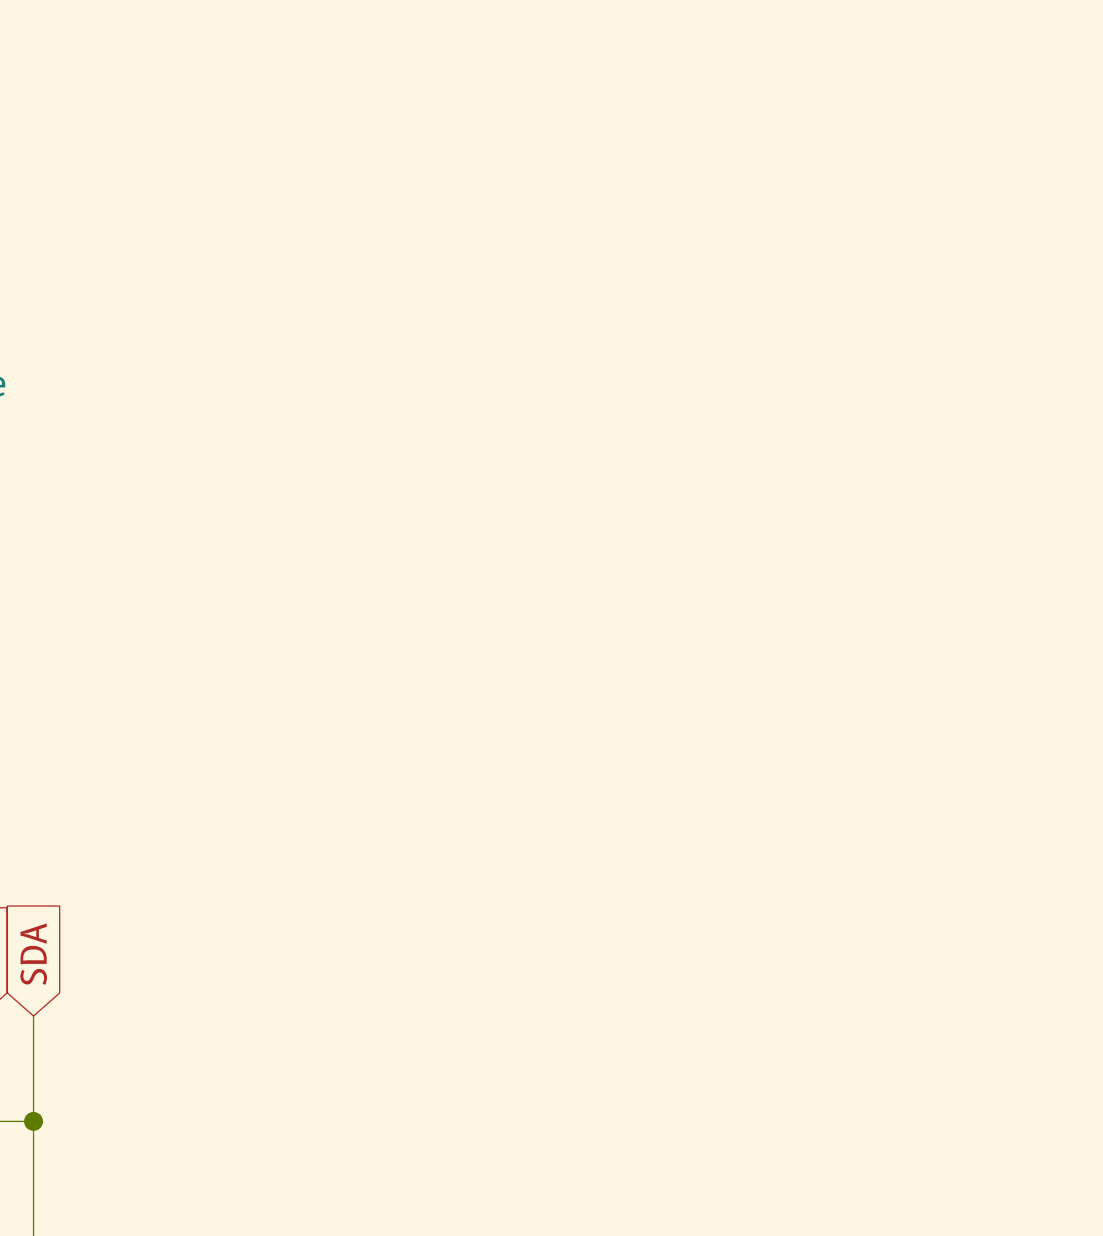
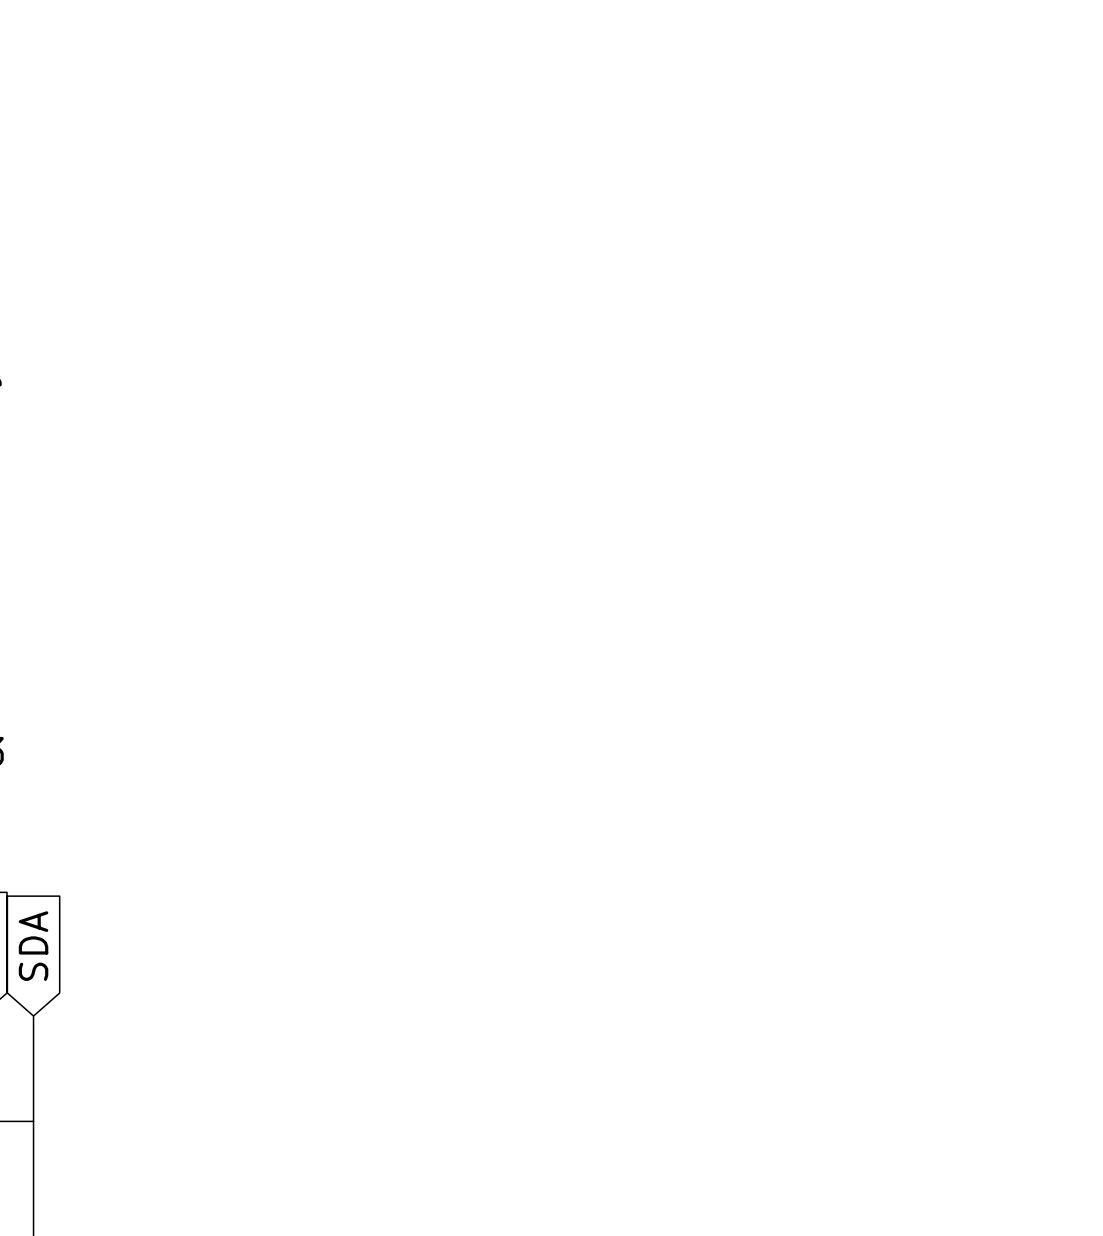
junction: (33, 1121) -> none

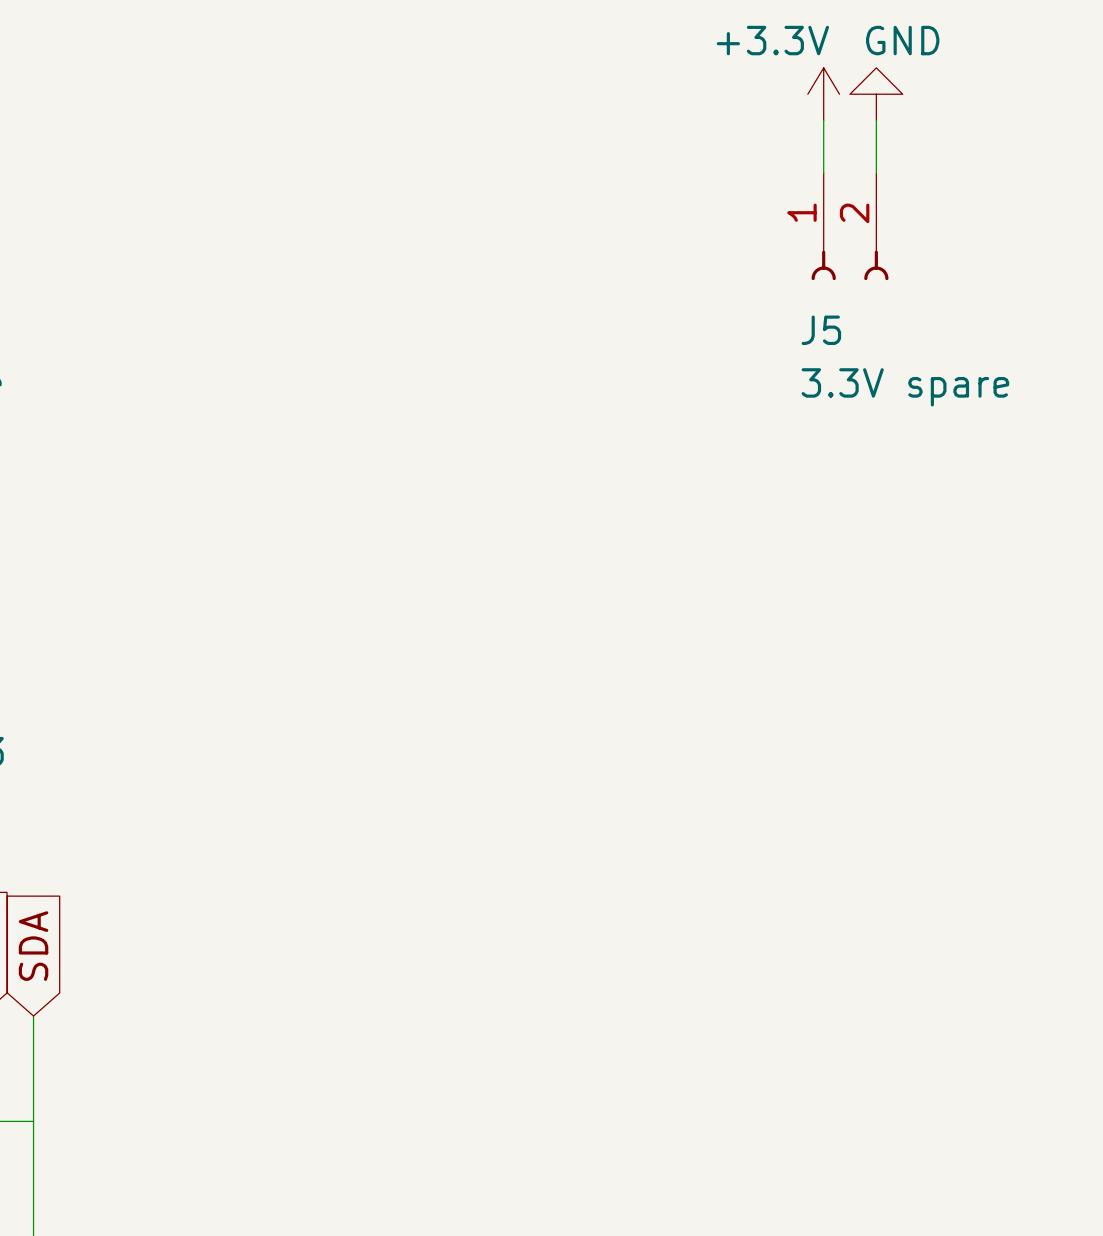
power symbol: none -> +3.3V (823, 94)
power symbol: none -> GND (876, 94)
wire: none -> (823, 120) (823, 173)
wire: none -> (876, 120) (876, 173)
J5: none -> 3.3V spare (850, 226)

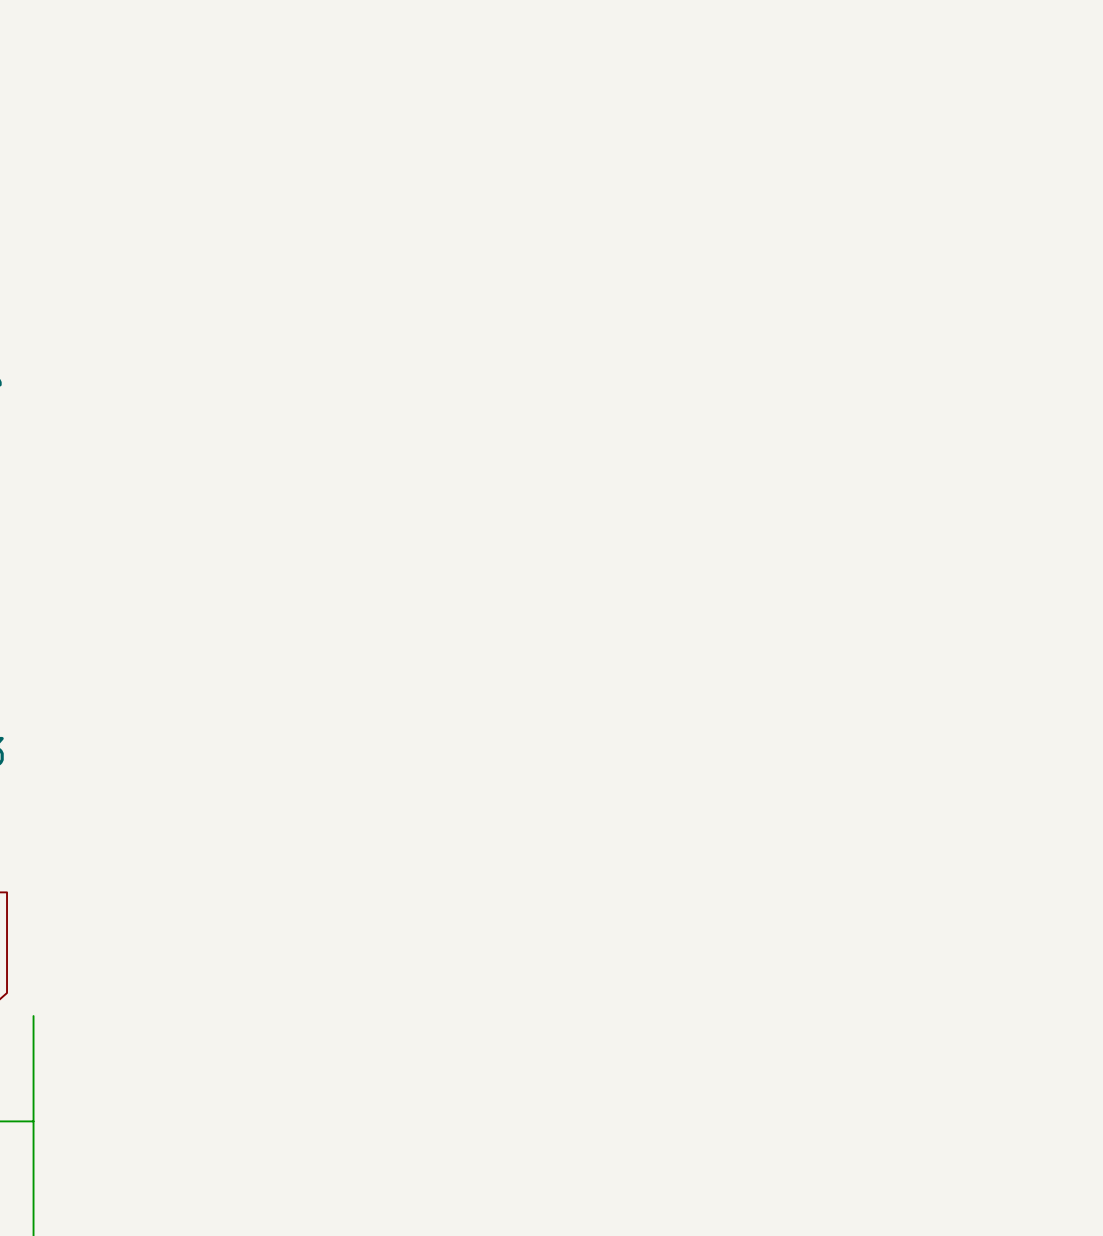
power symbol: +3.3V (823, 94) -> none
power symbol: GND (876, 94) -> none
wire: (823, 120) (823, 173) -> none
wire: (876, 120) (876, 173) -> none
J5: 3.3V spare (850, 226) -> none
global label: SDA (33, 946) -> none

